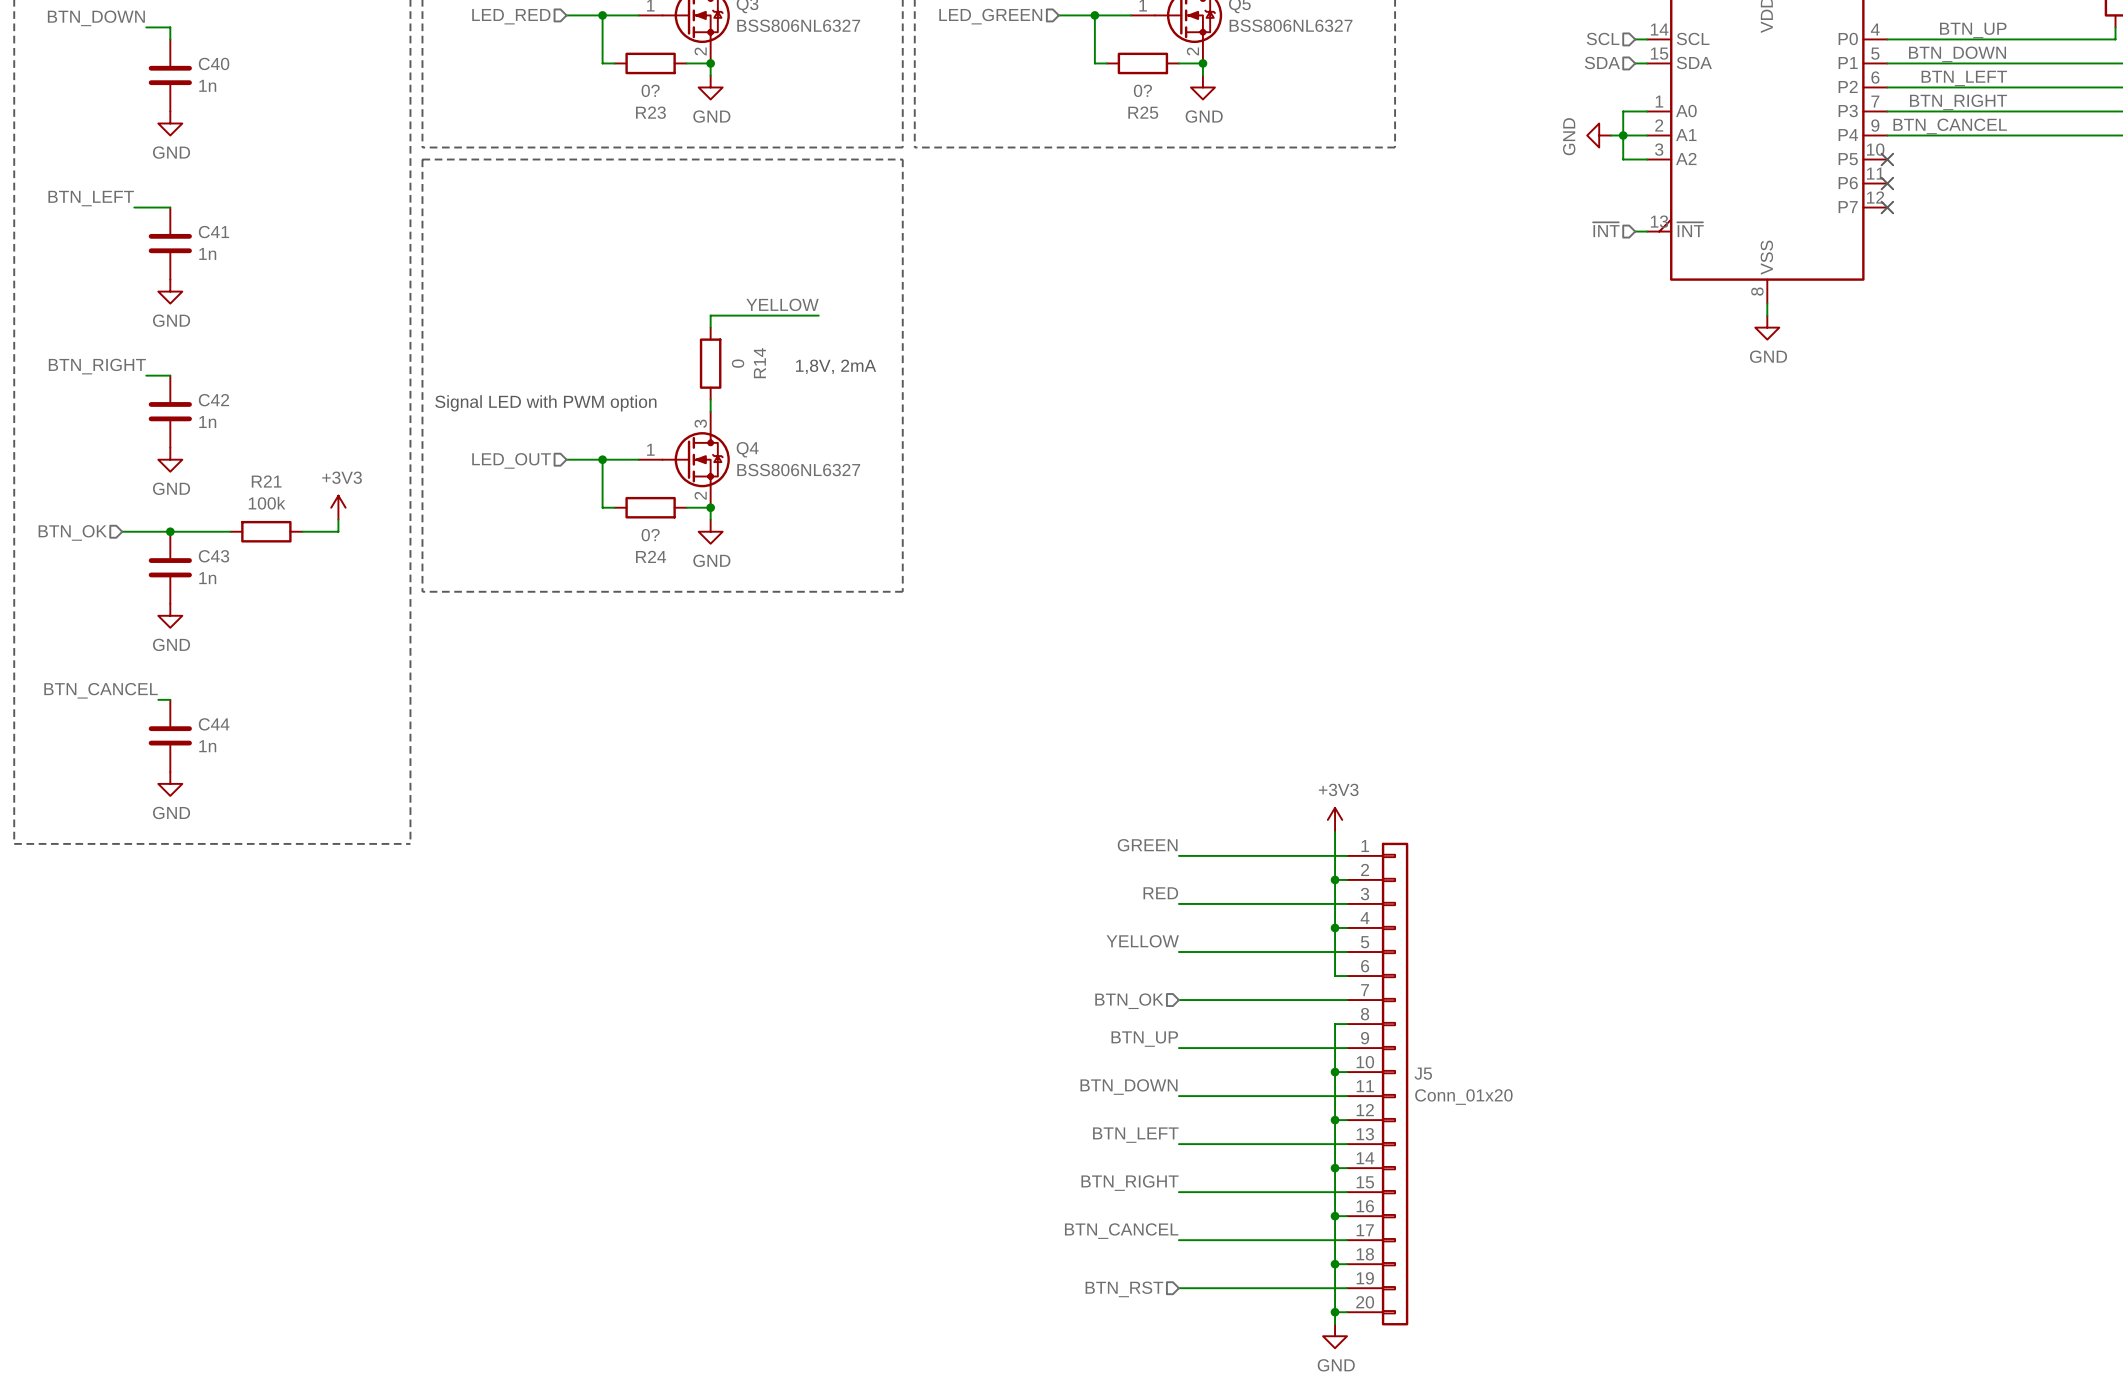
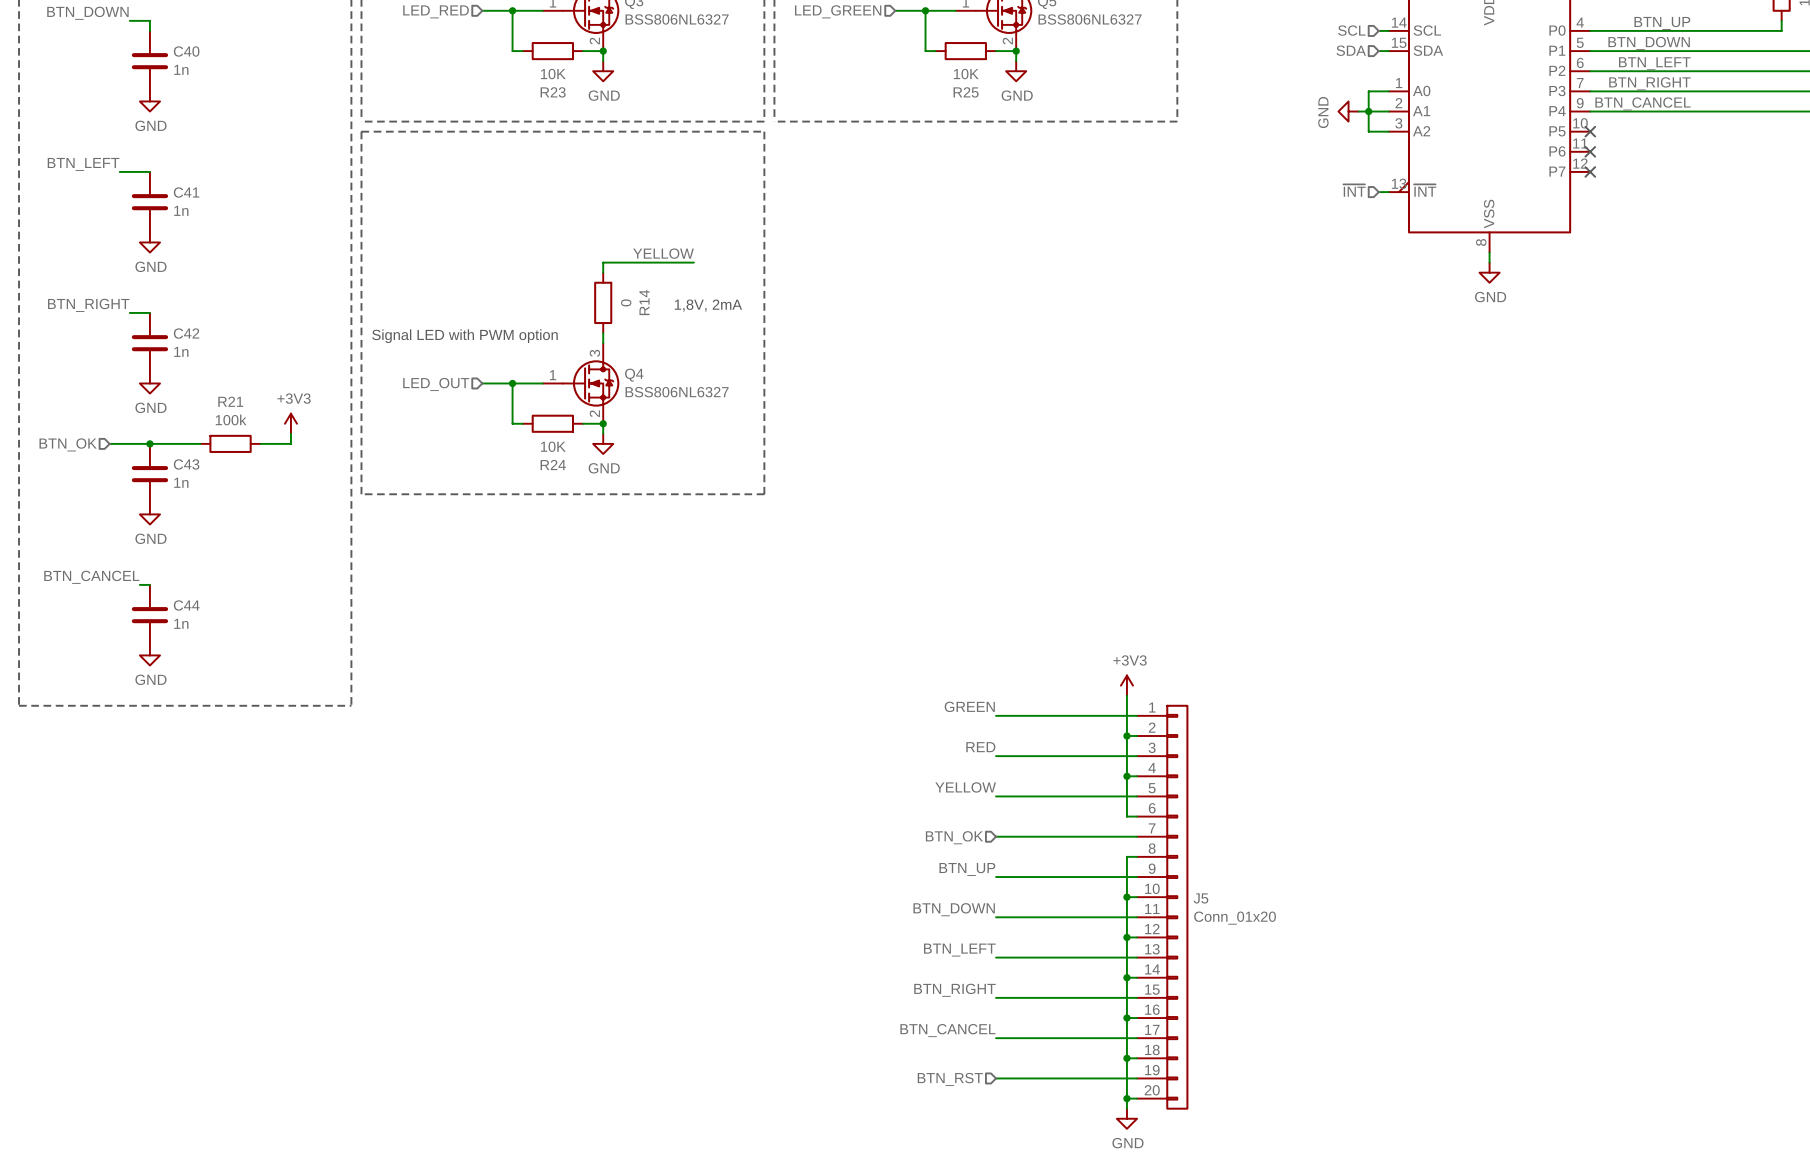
R23 value: 0? (650, 90) -> 10K (553, 74)
R25 value: 0? (1142, 90) -> 10K (966, 74)
R24 value: 0? (650, 535) -> 10K (553, 446)

